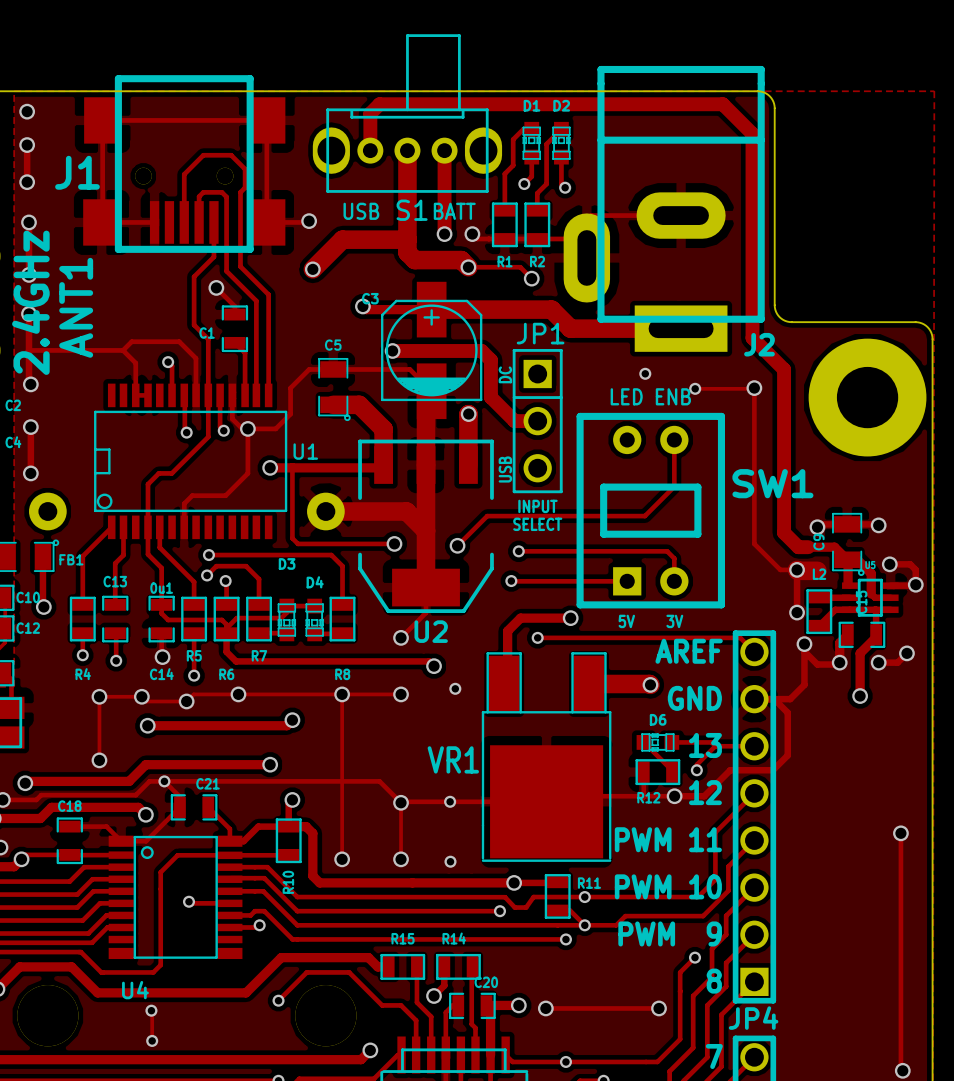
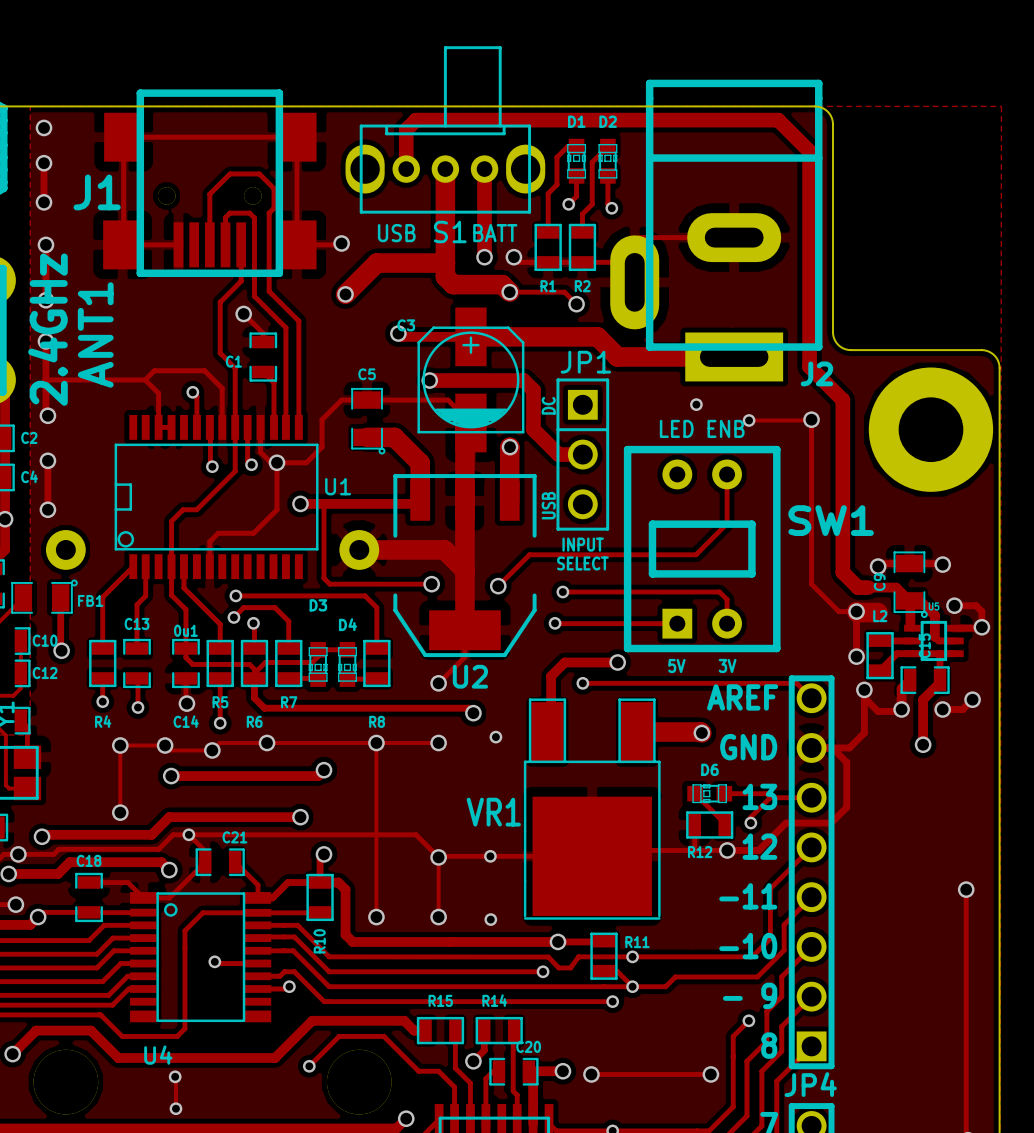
text: PWM 11 (668, 839) -> -11 (748, 896)
text: PWM 10 (668, 886) -> -10 (748, 946)
text: PWM 9 (670, 933) -> - 9 (750, 995)

